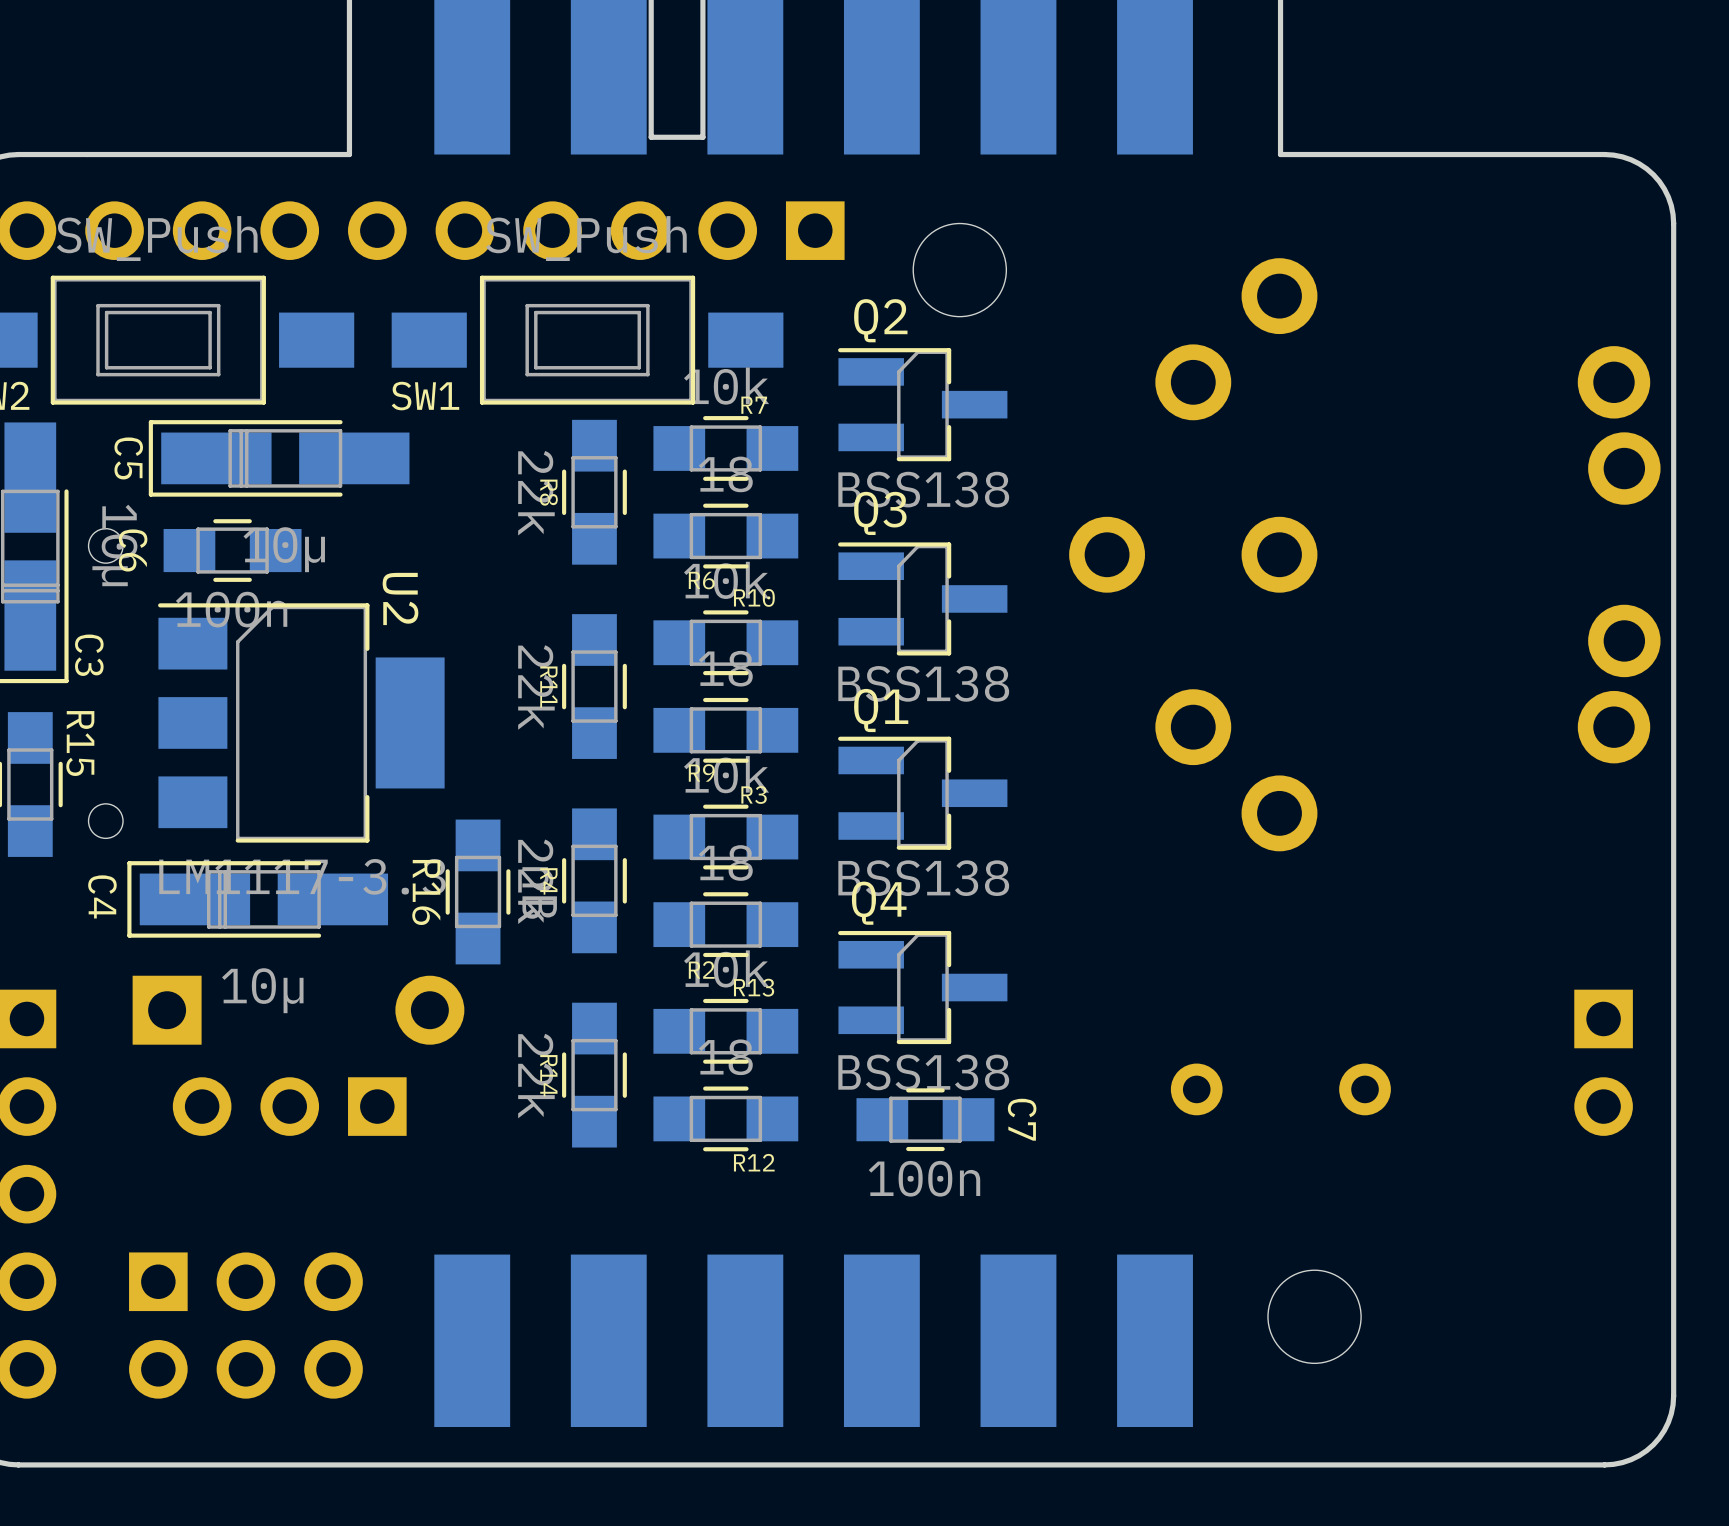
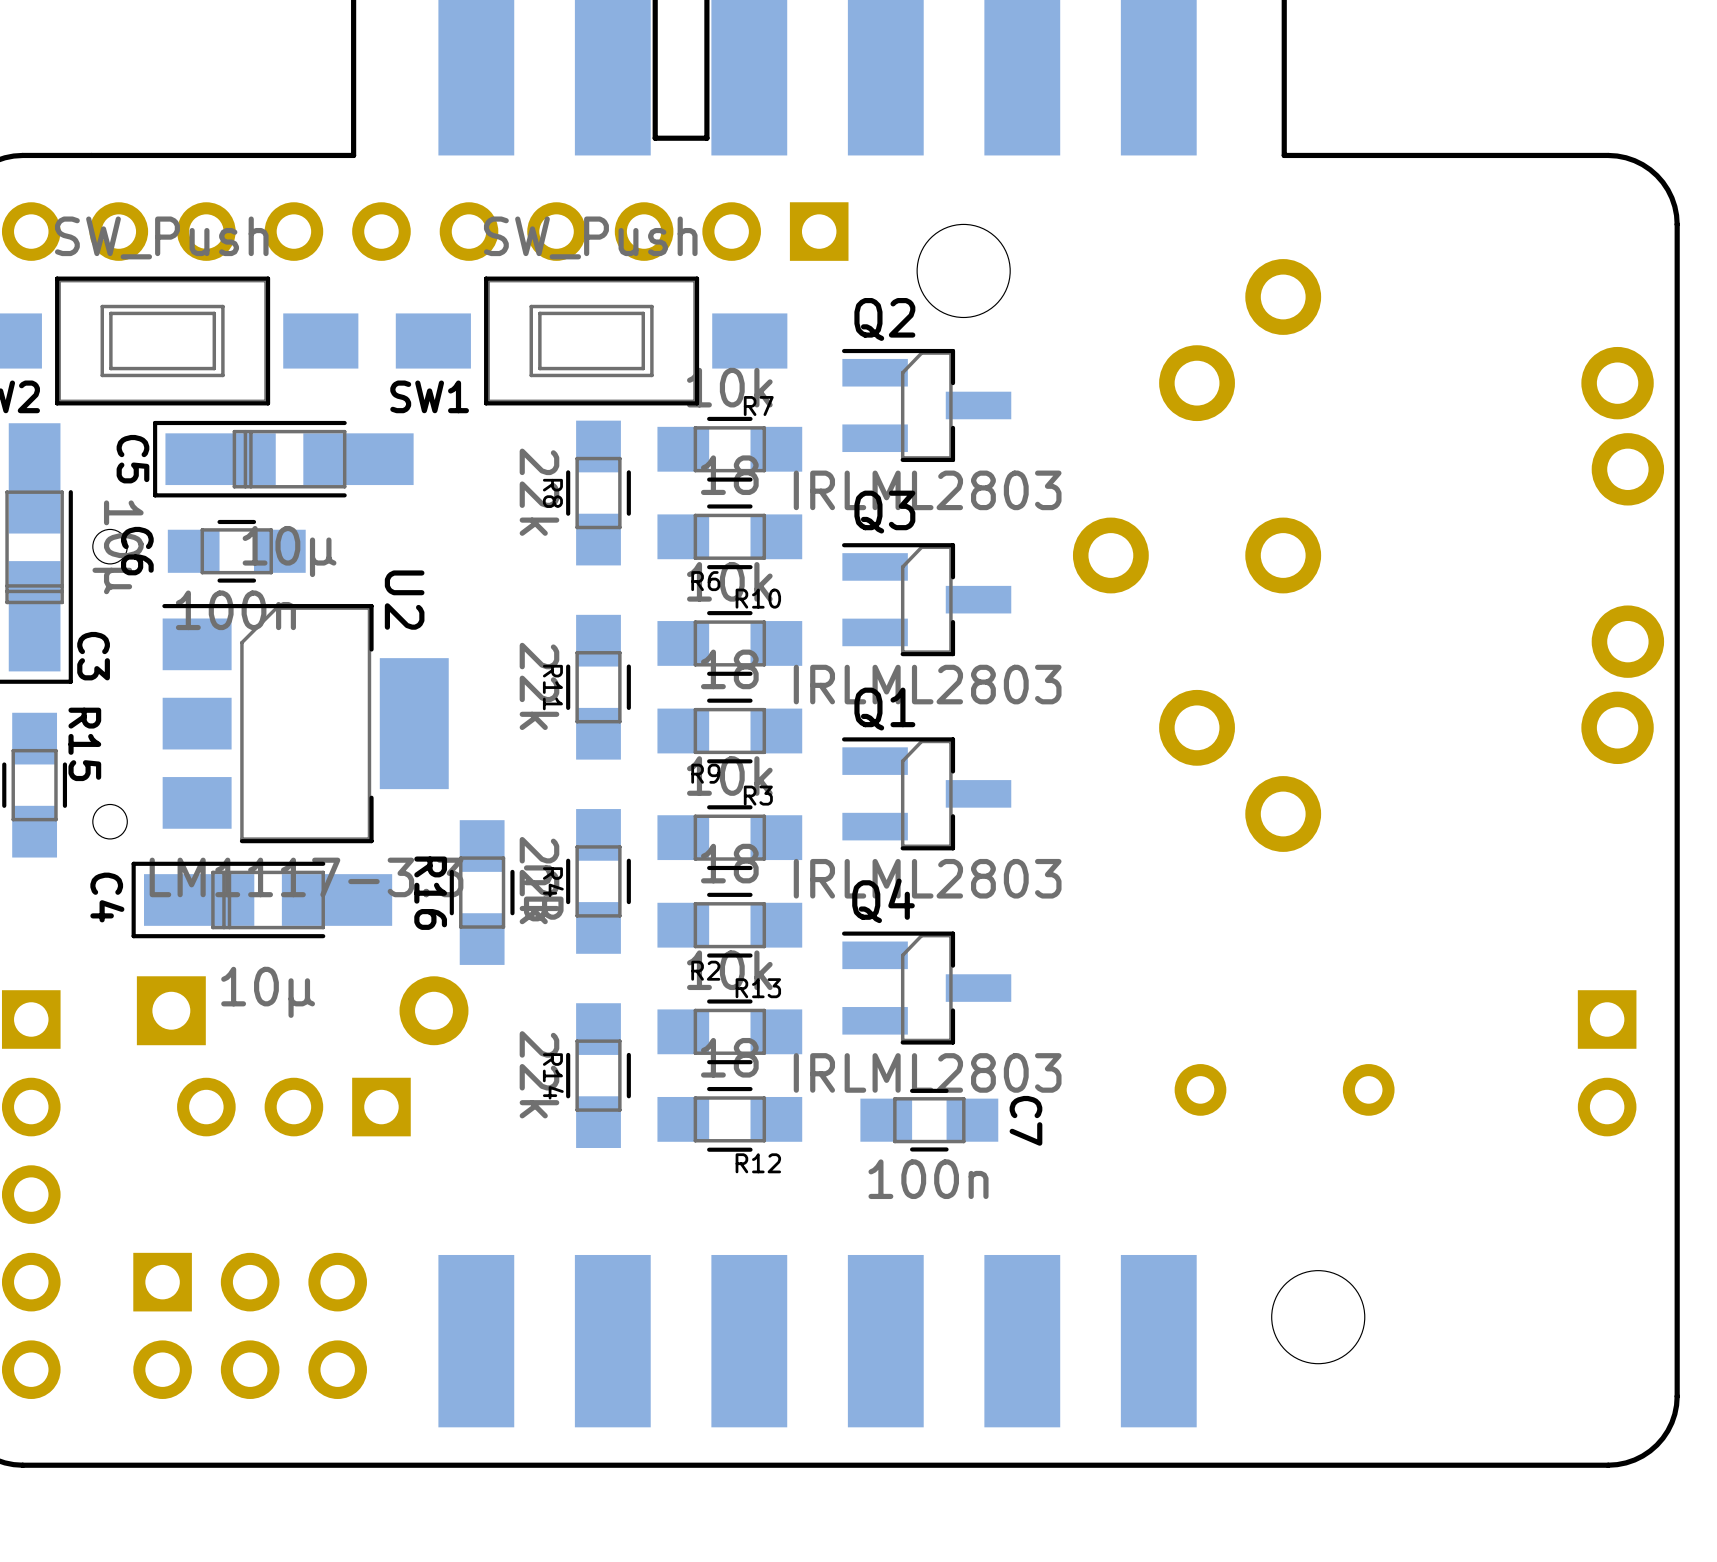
Q2 value: BSS138 (923, 489) -> IRLML2803 (927, 490)
Q3 value: BSS138 (923, 683) -> IRLML2803 (927, 684)
Q1 value: BSS138 (923, 878) -> IRLML2803 (927, 878)
Q4 value: BSS138 (923, 1072) -> IRLML2803 (927, 1072)

